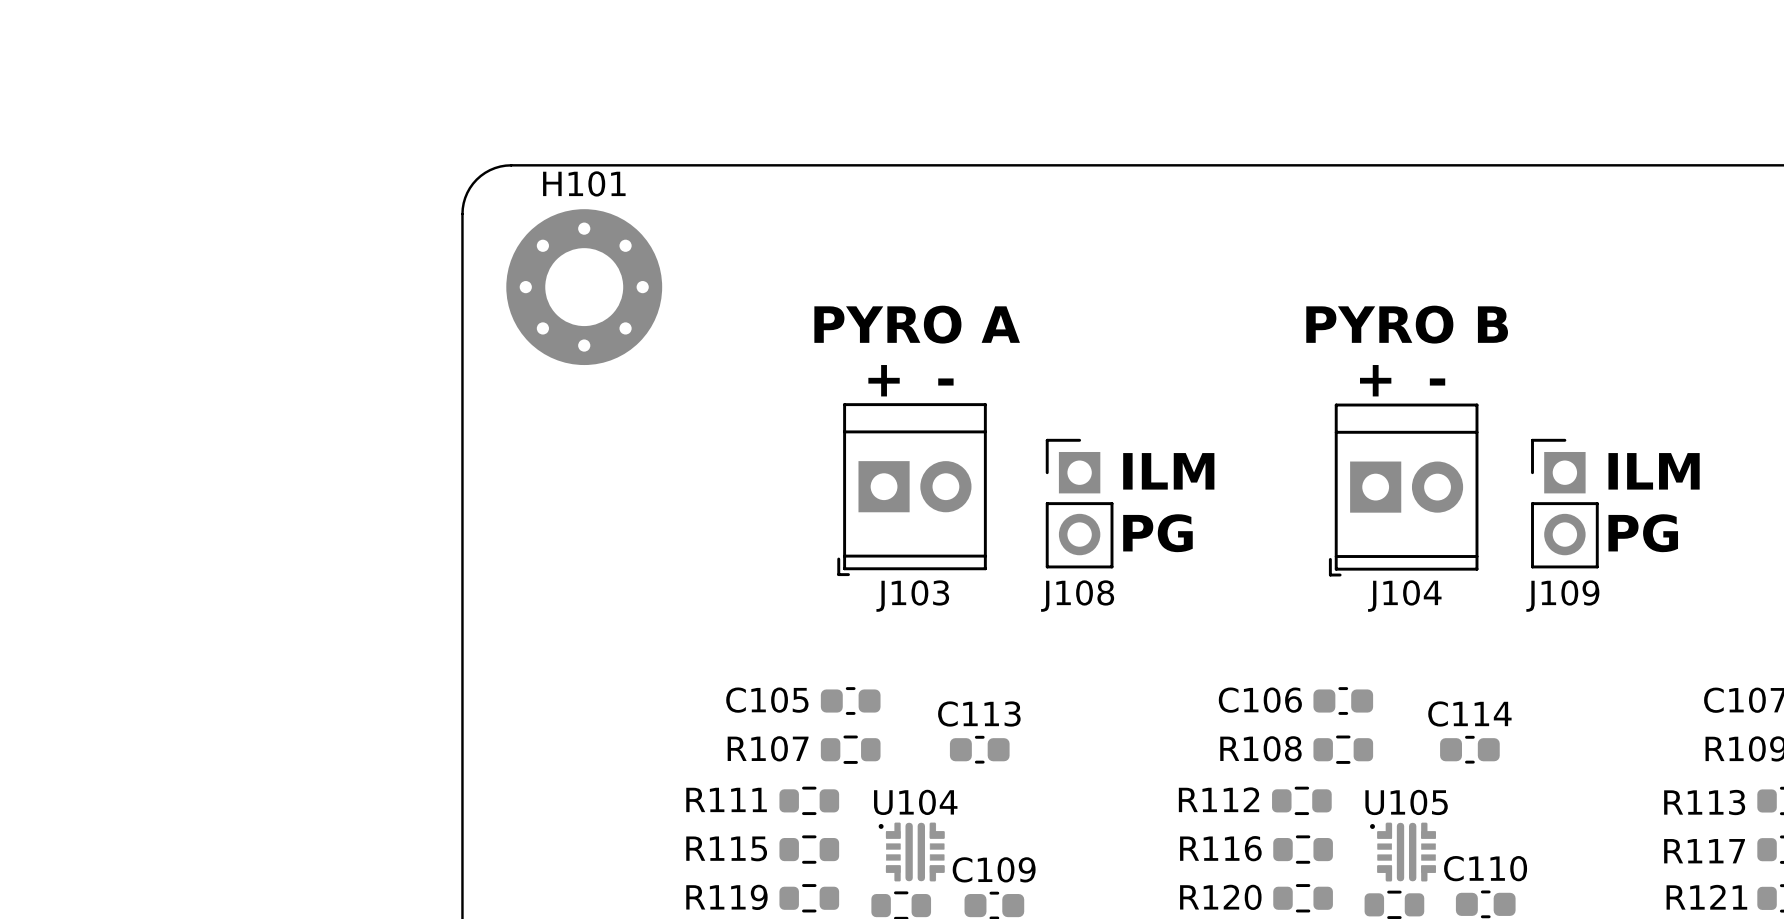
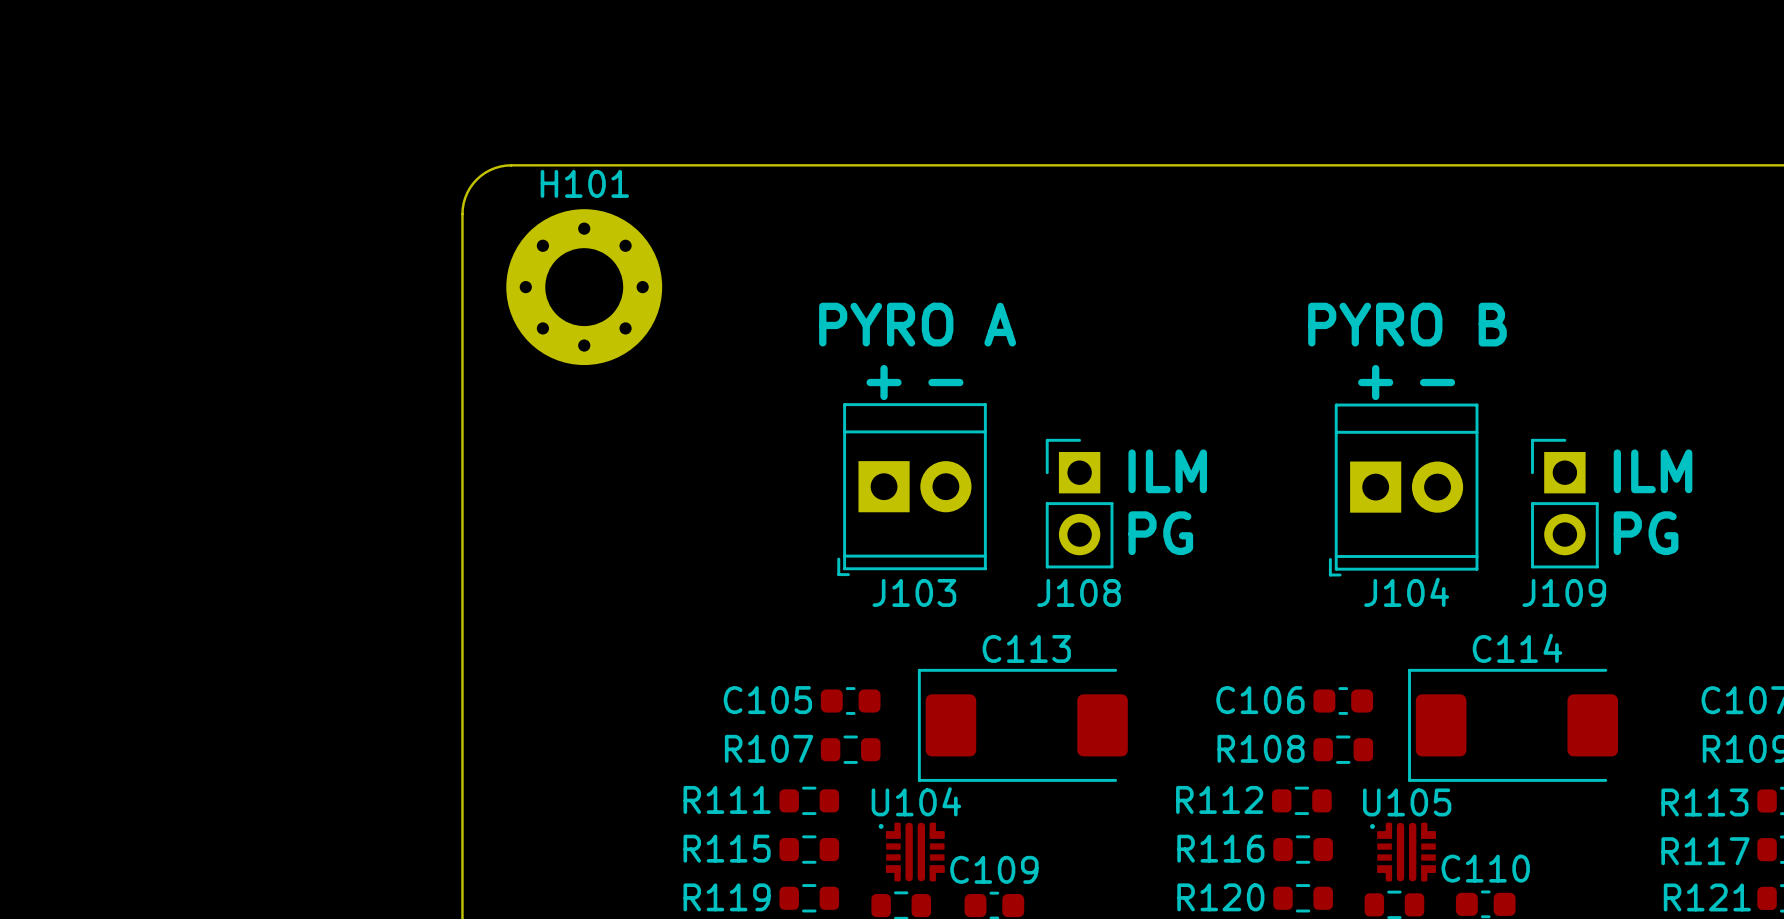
C113 footprint: [949, 735, 1010, 764] -> [917, 668, 1128, 782]
C114 footprint: [1440, 735, 1500, 764] -> [1408, 668, 1618, 782]

